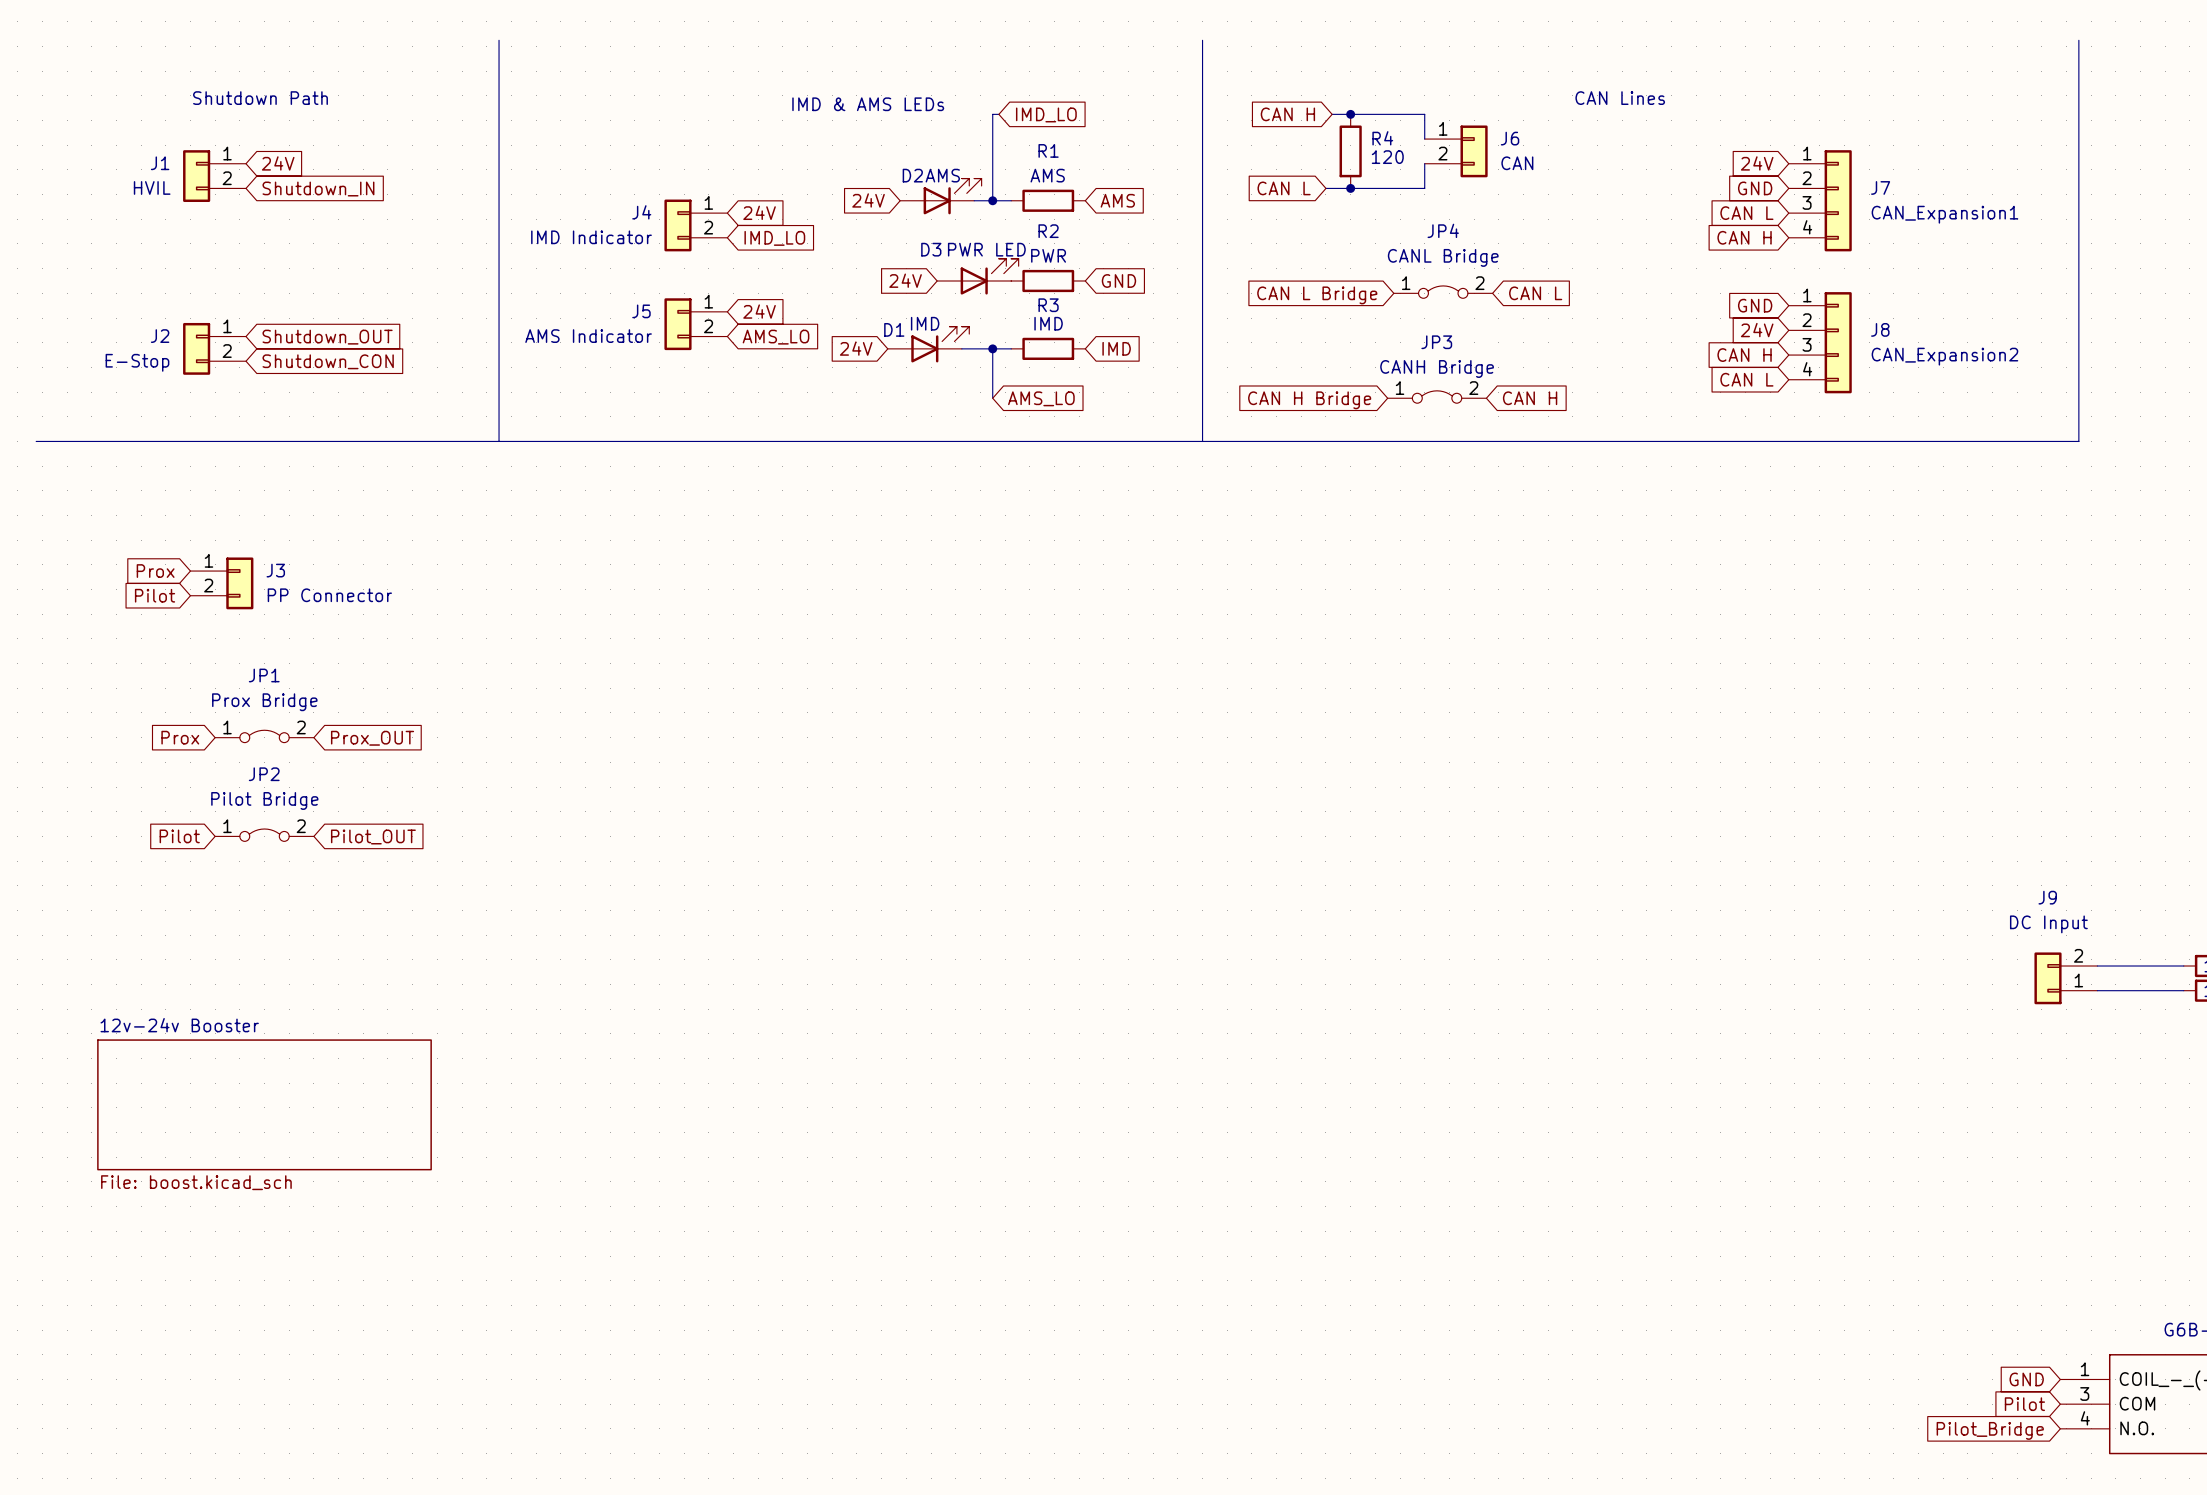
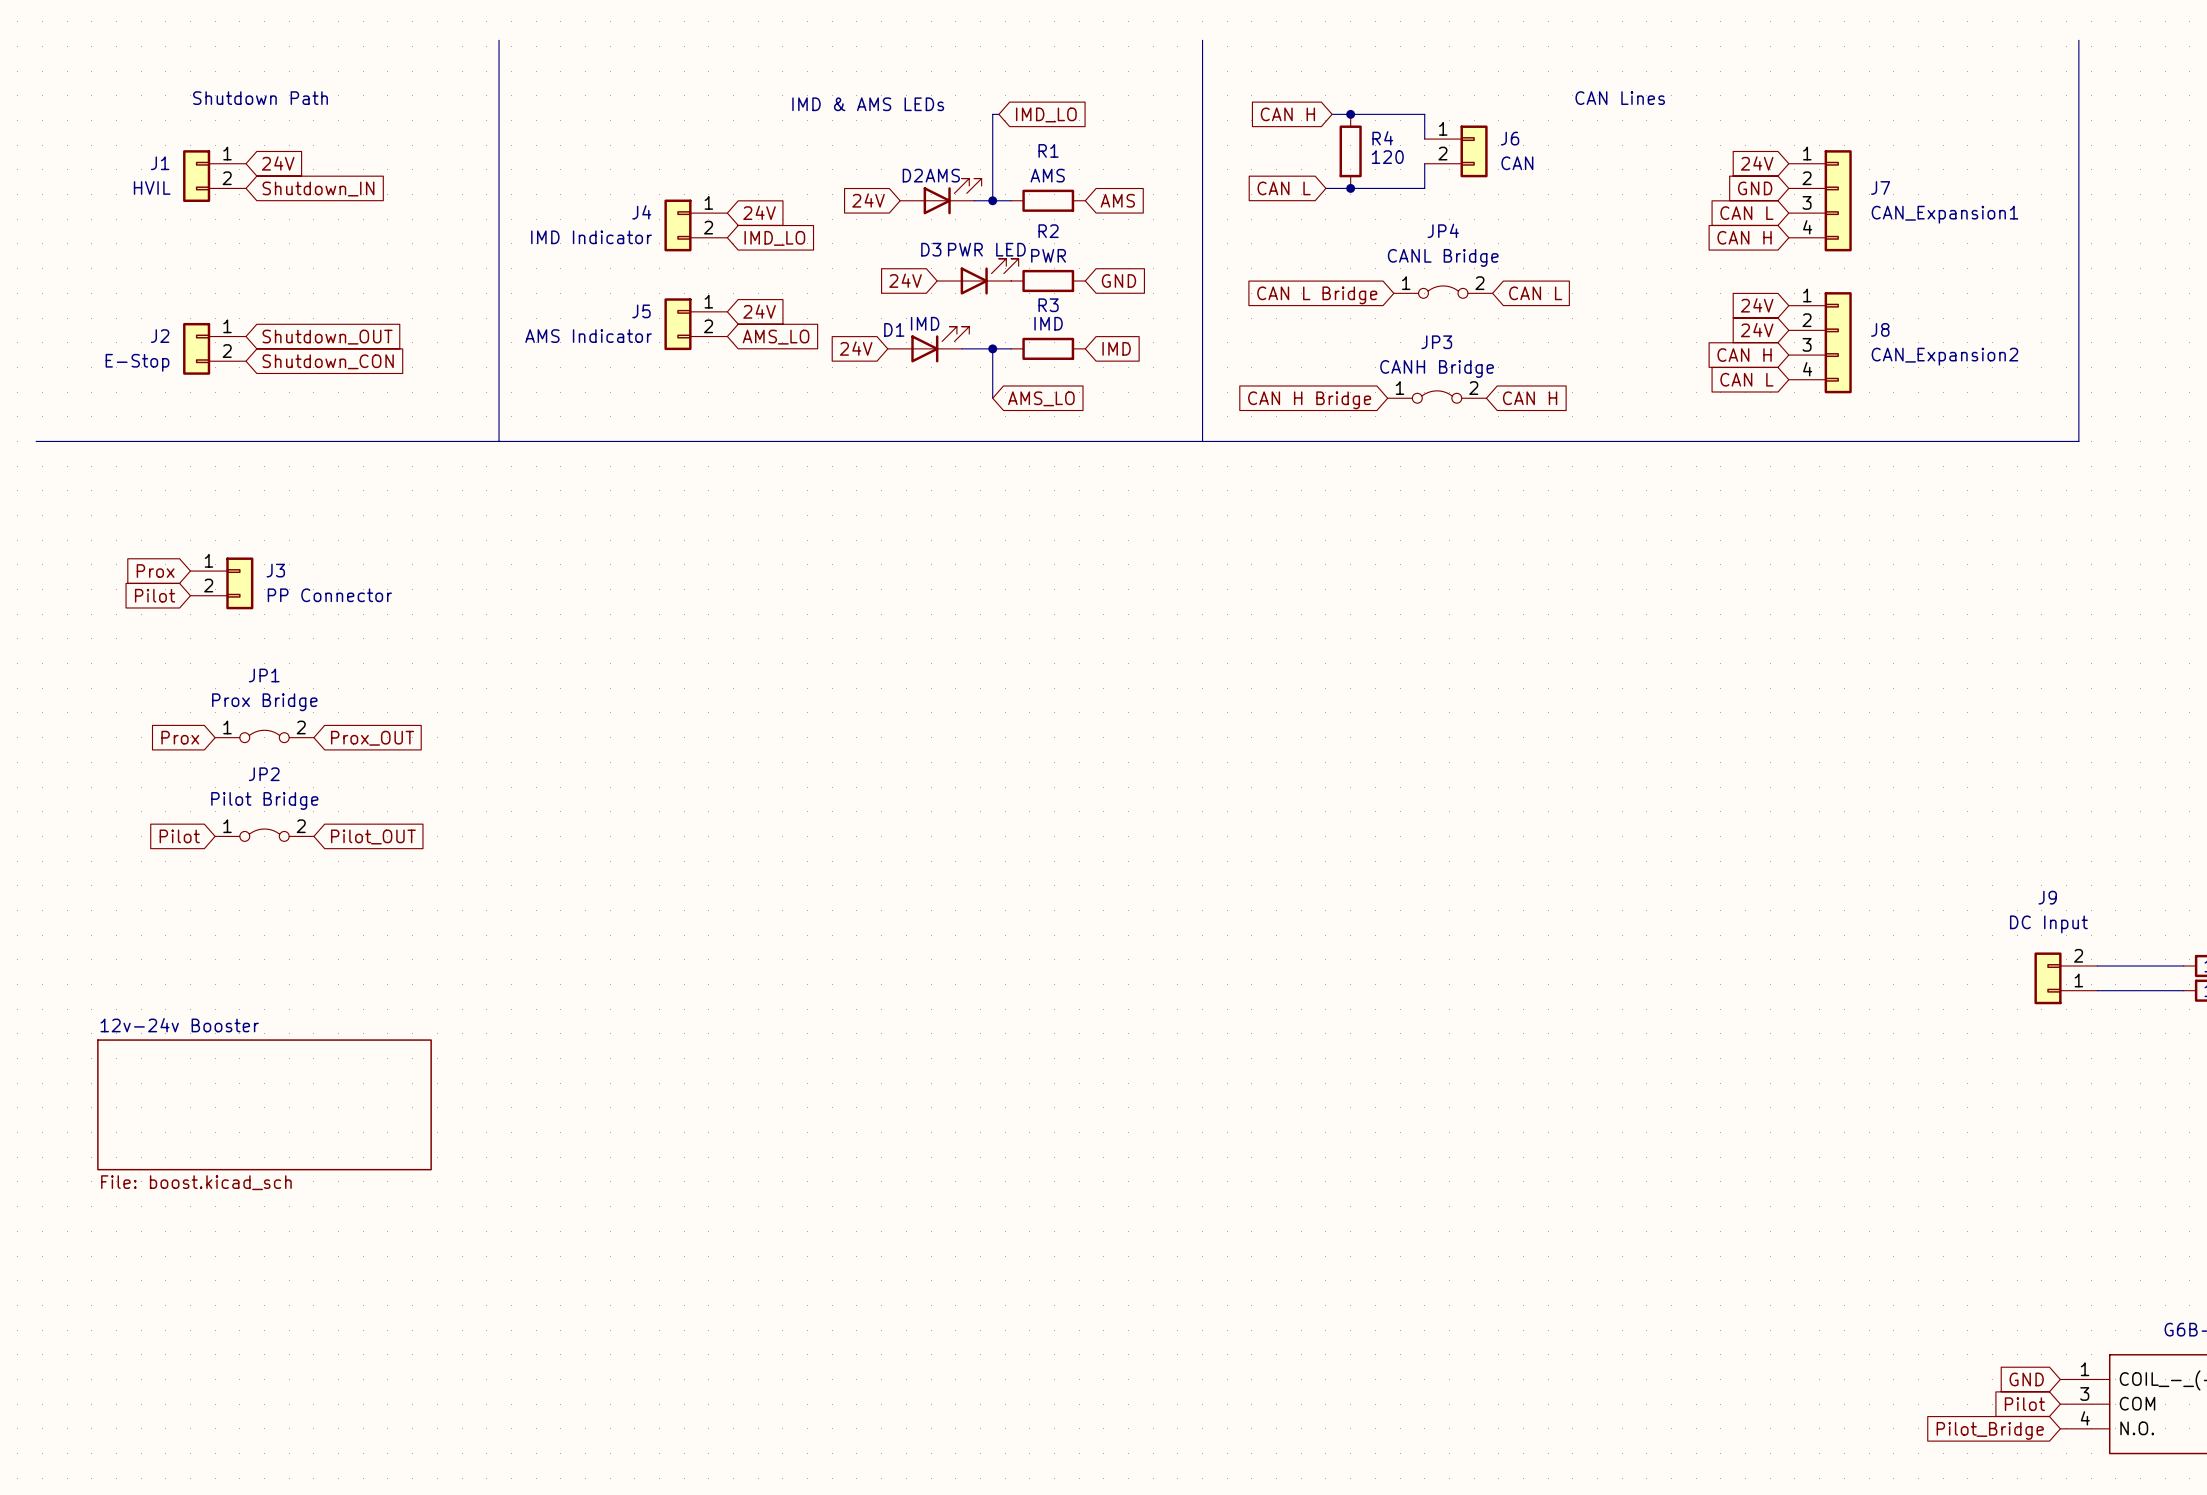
global label: GND (1755, 305) -> 24V (1757, 305)

